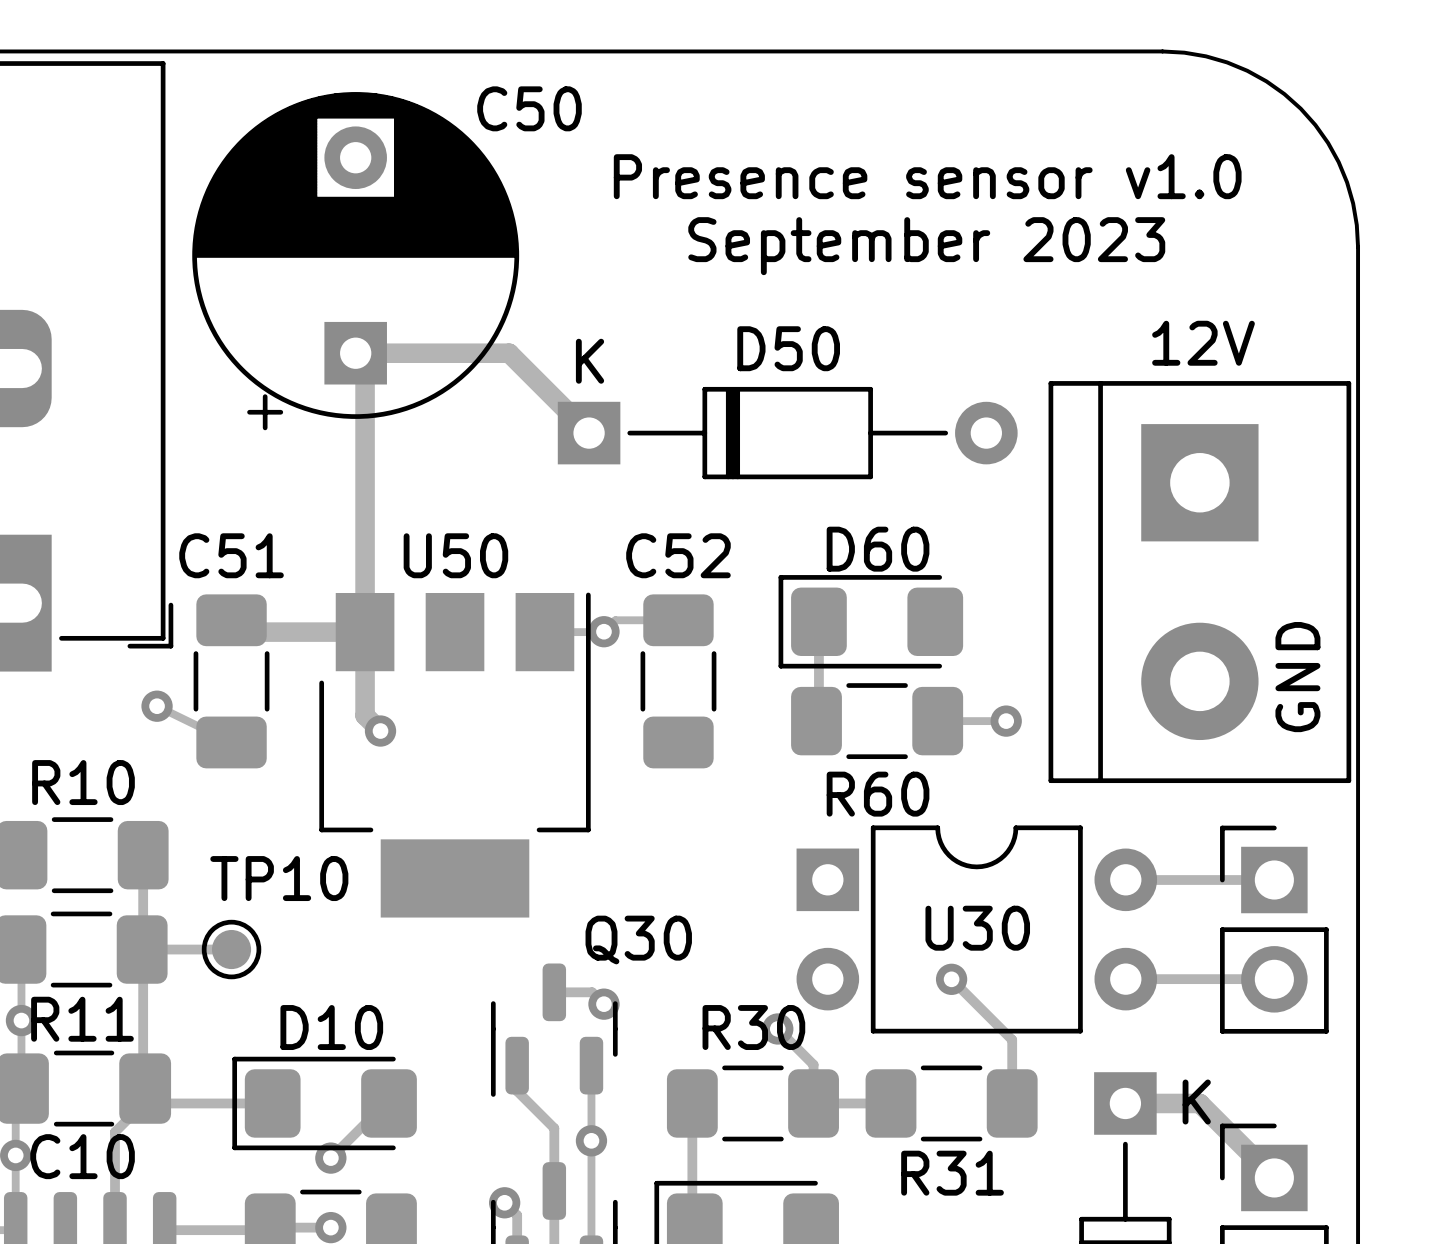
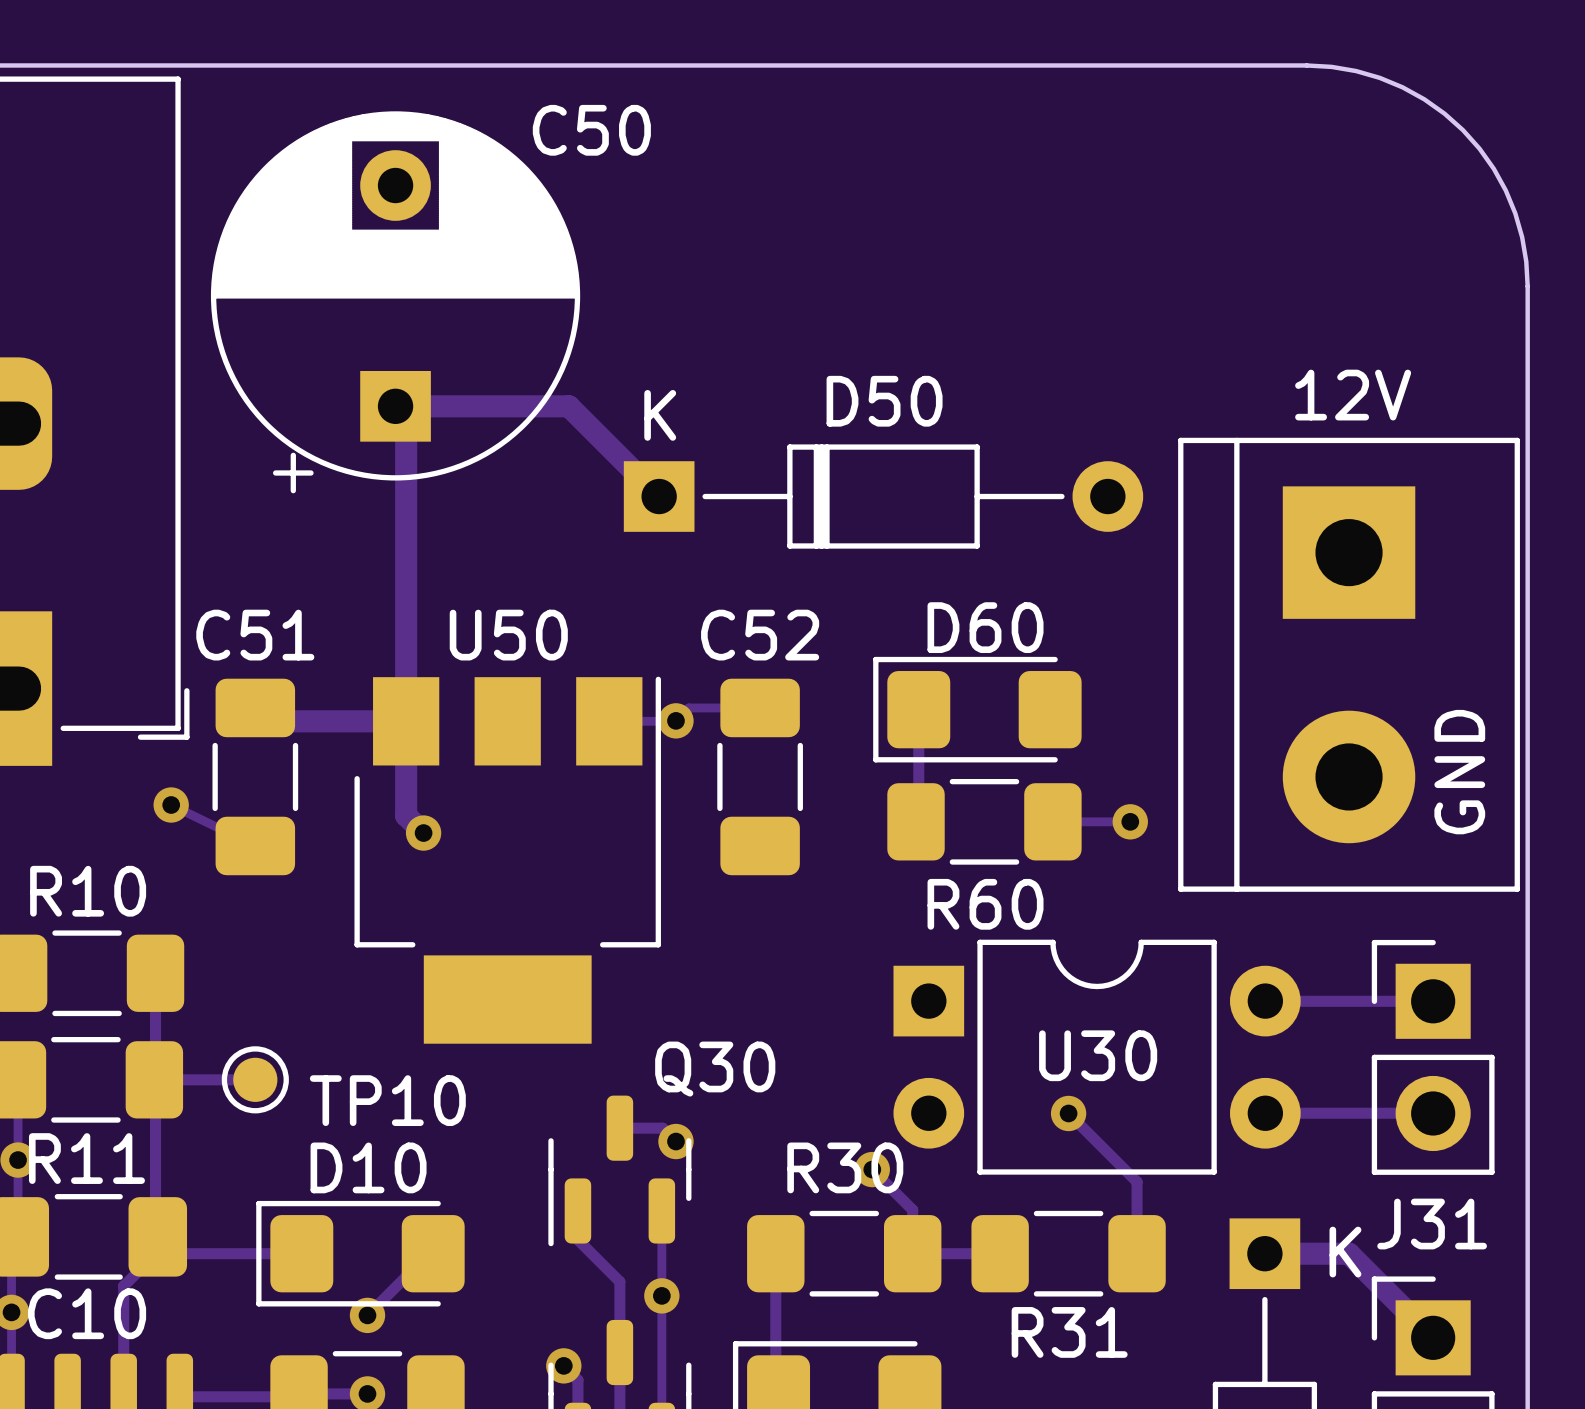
text: Presence sensor v1.0 (927, 176) -> none
text: September 2023 (926, 246) -> none
TP10 name position: TP10 (279, 878) -> TP10 (387, 1100)
J31 name: none -> J31 (1432, 1224)

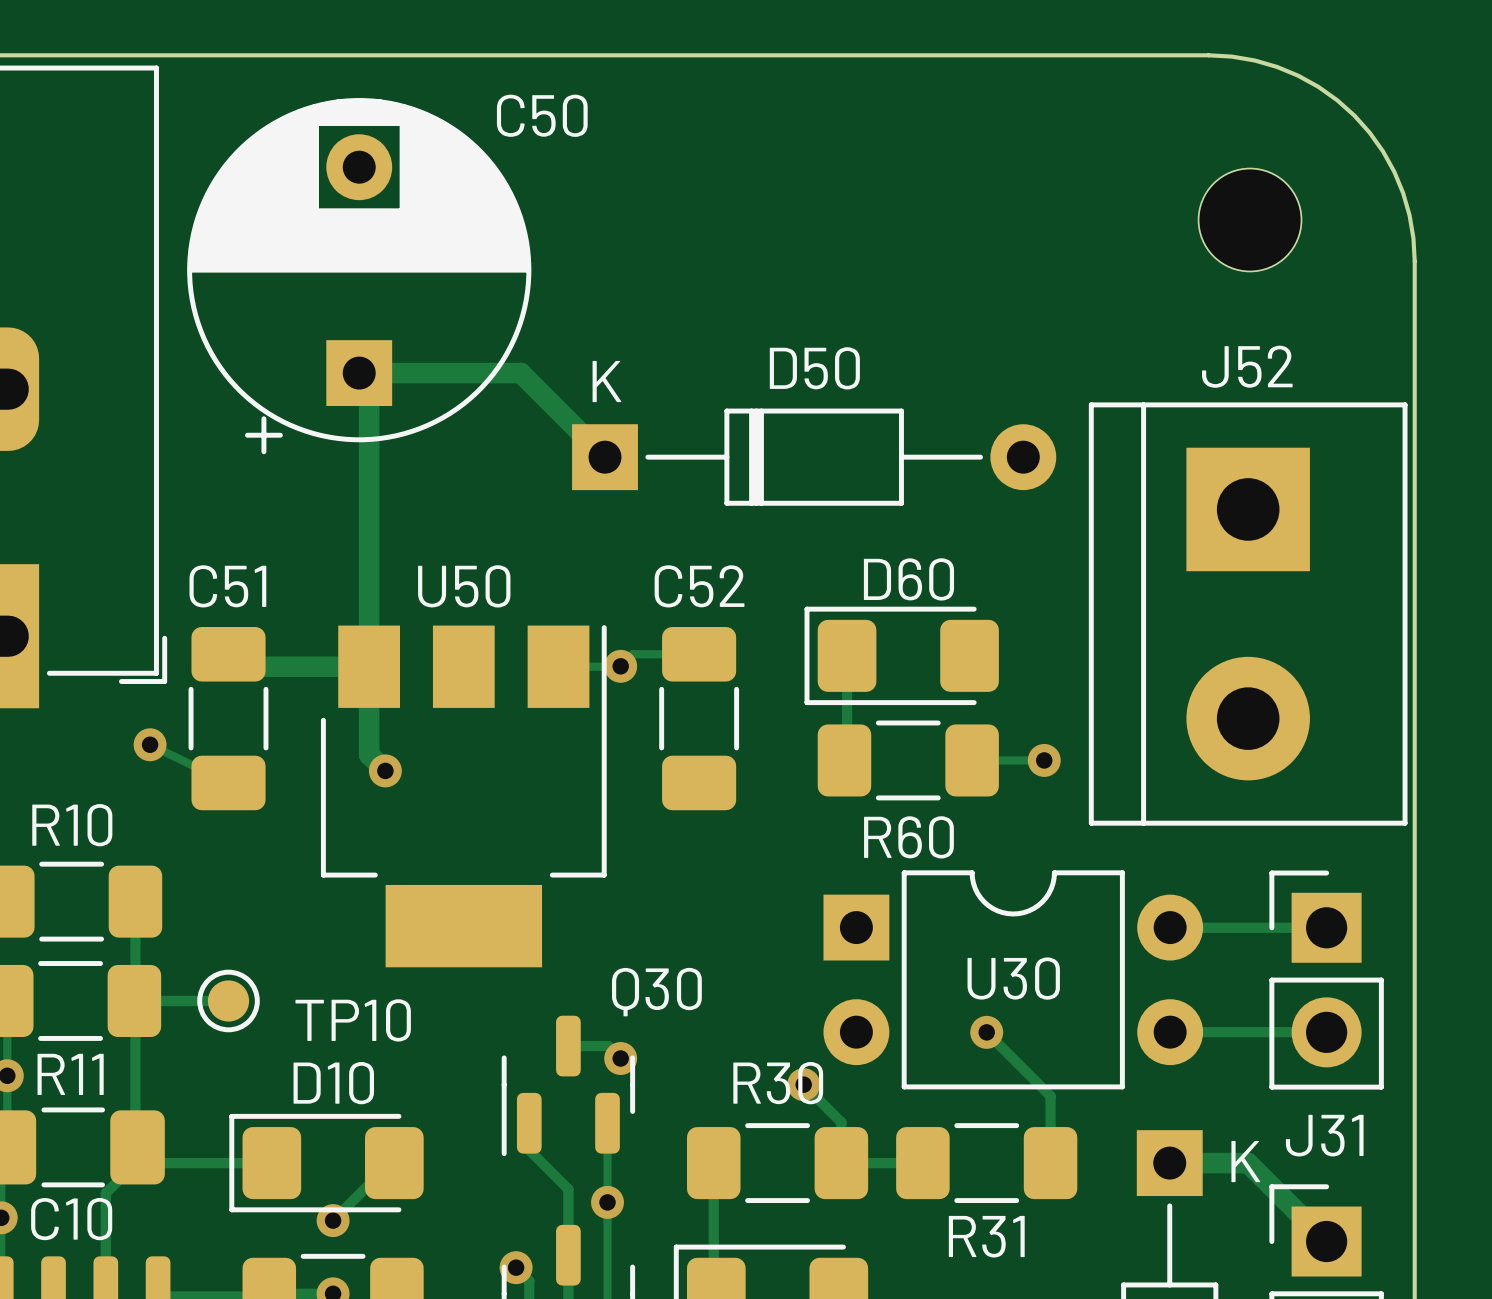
part: none -> (1250, 220)
text: 12V (1353, 395) -> none
J52 name: none -> J52 (1247, 366)
text: GND (1459, 772) -> none

